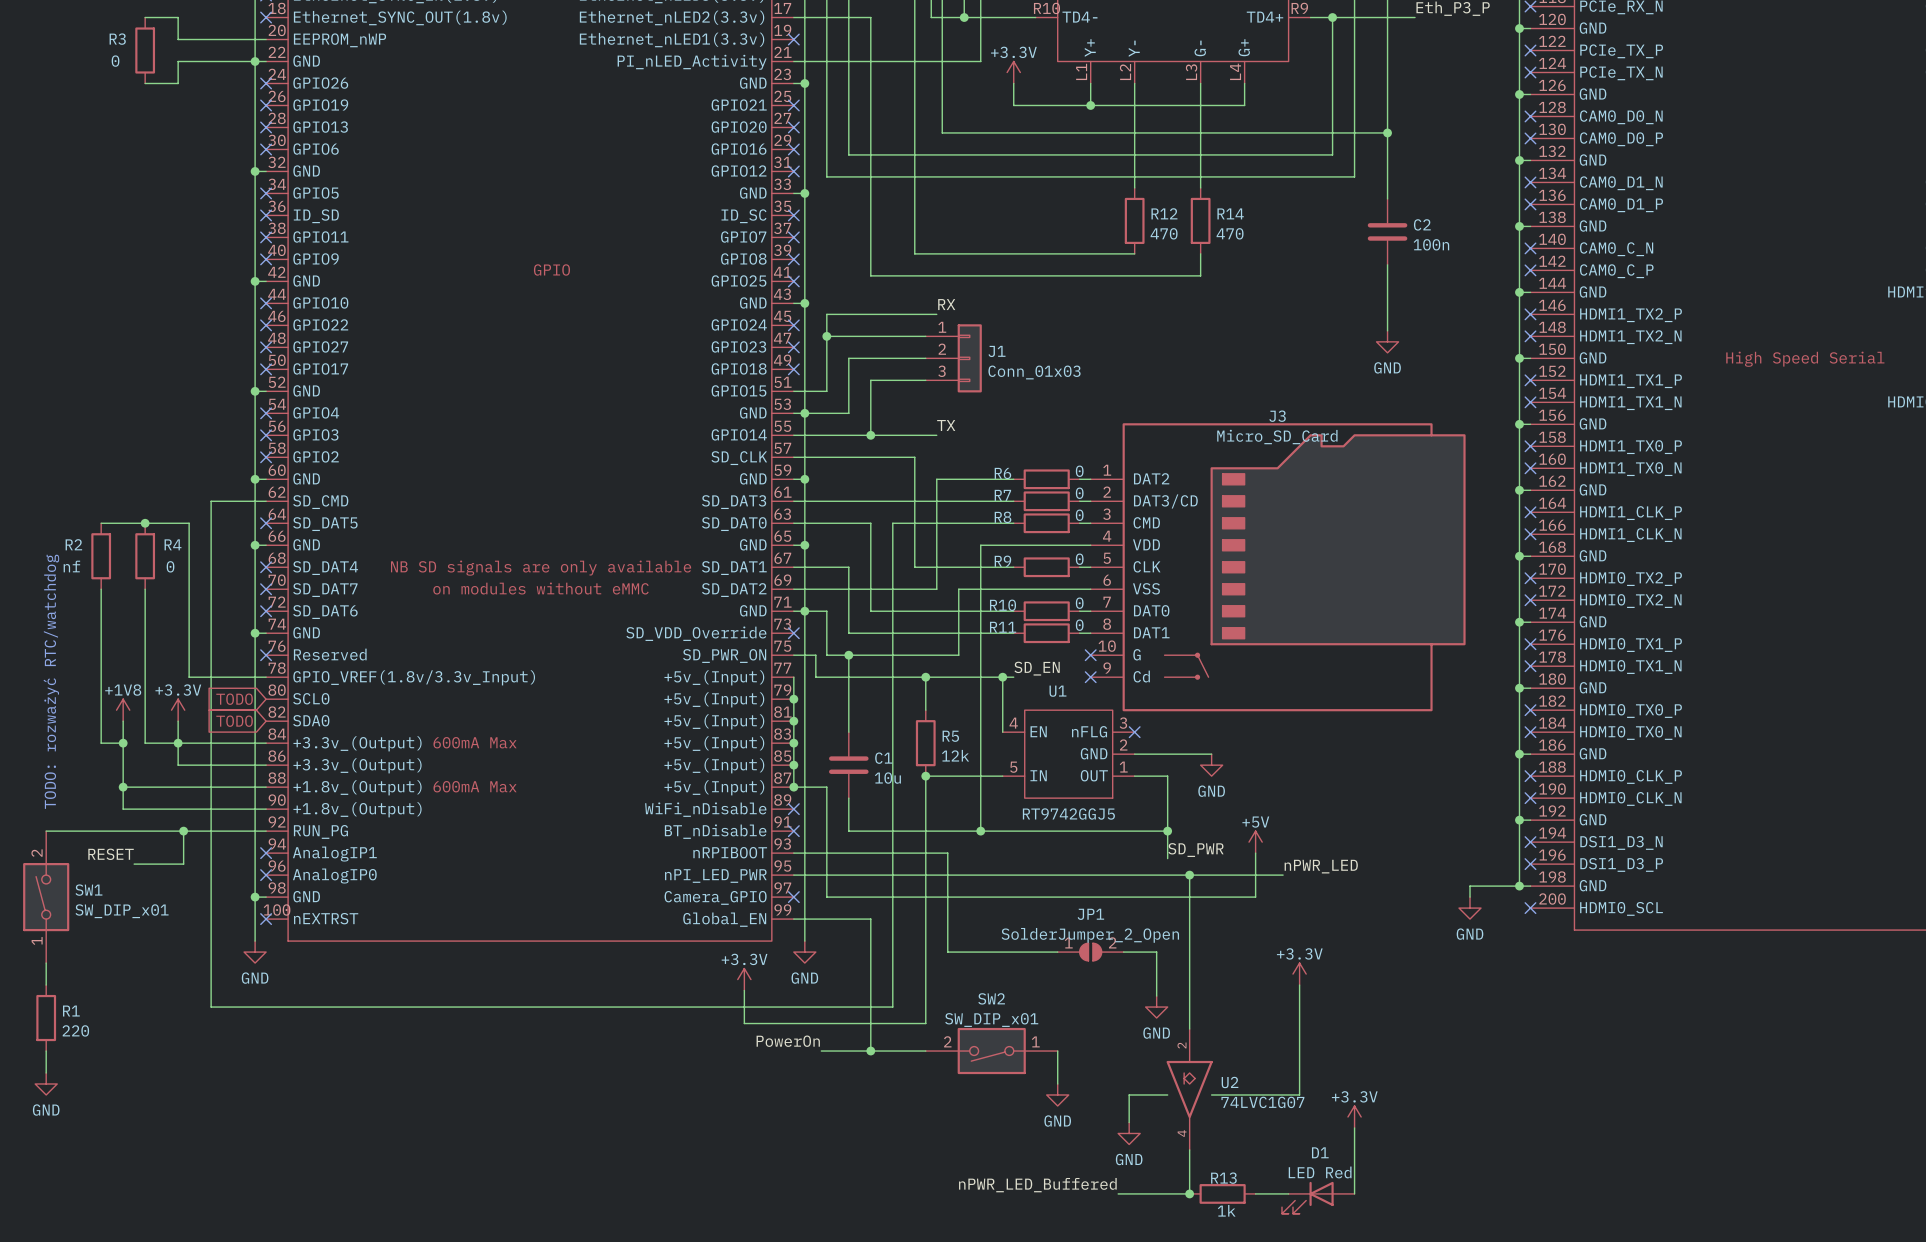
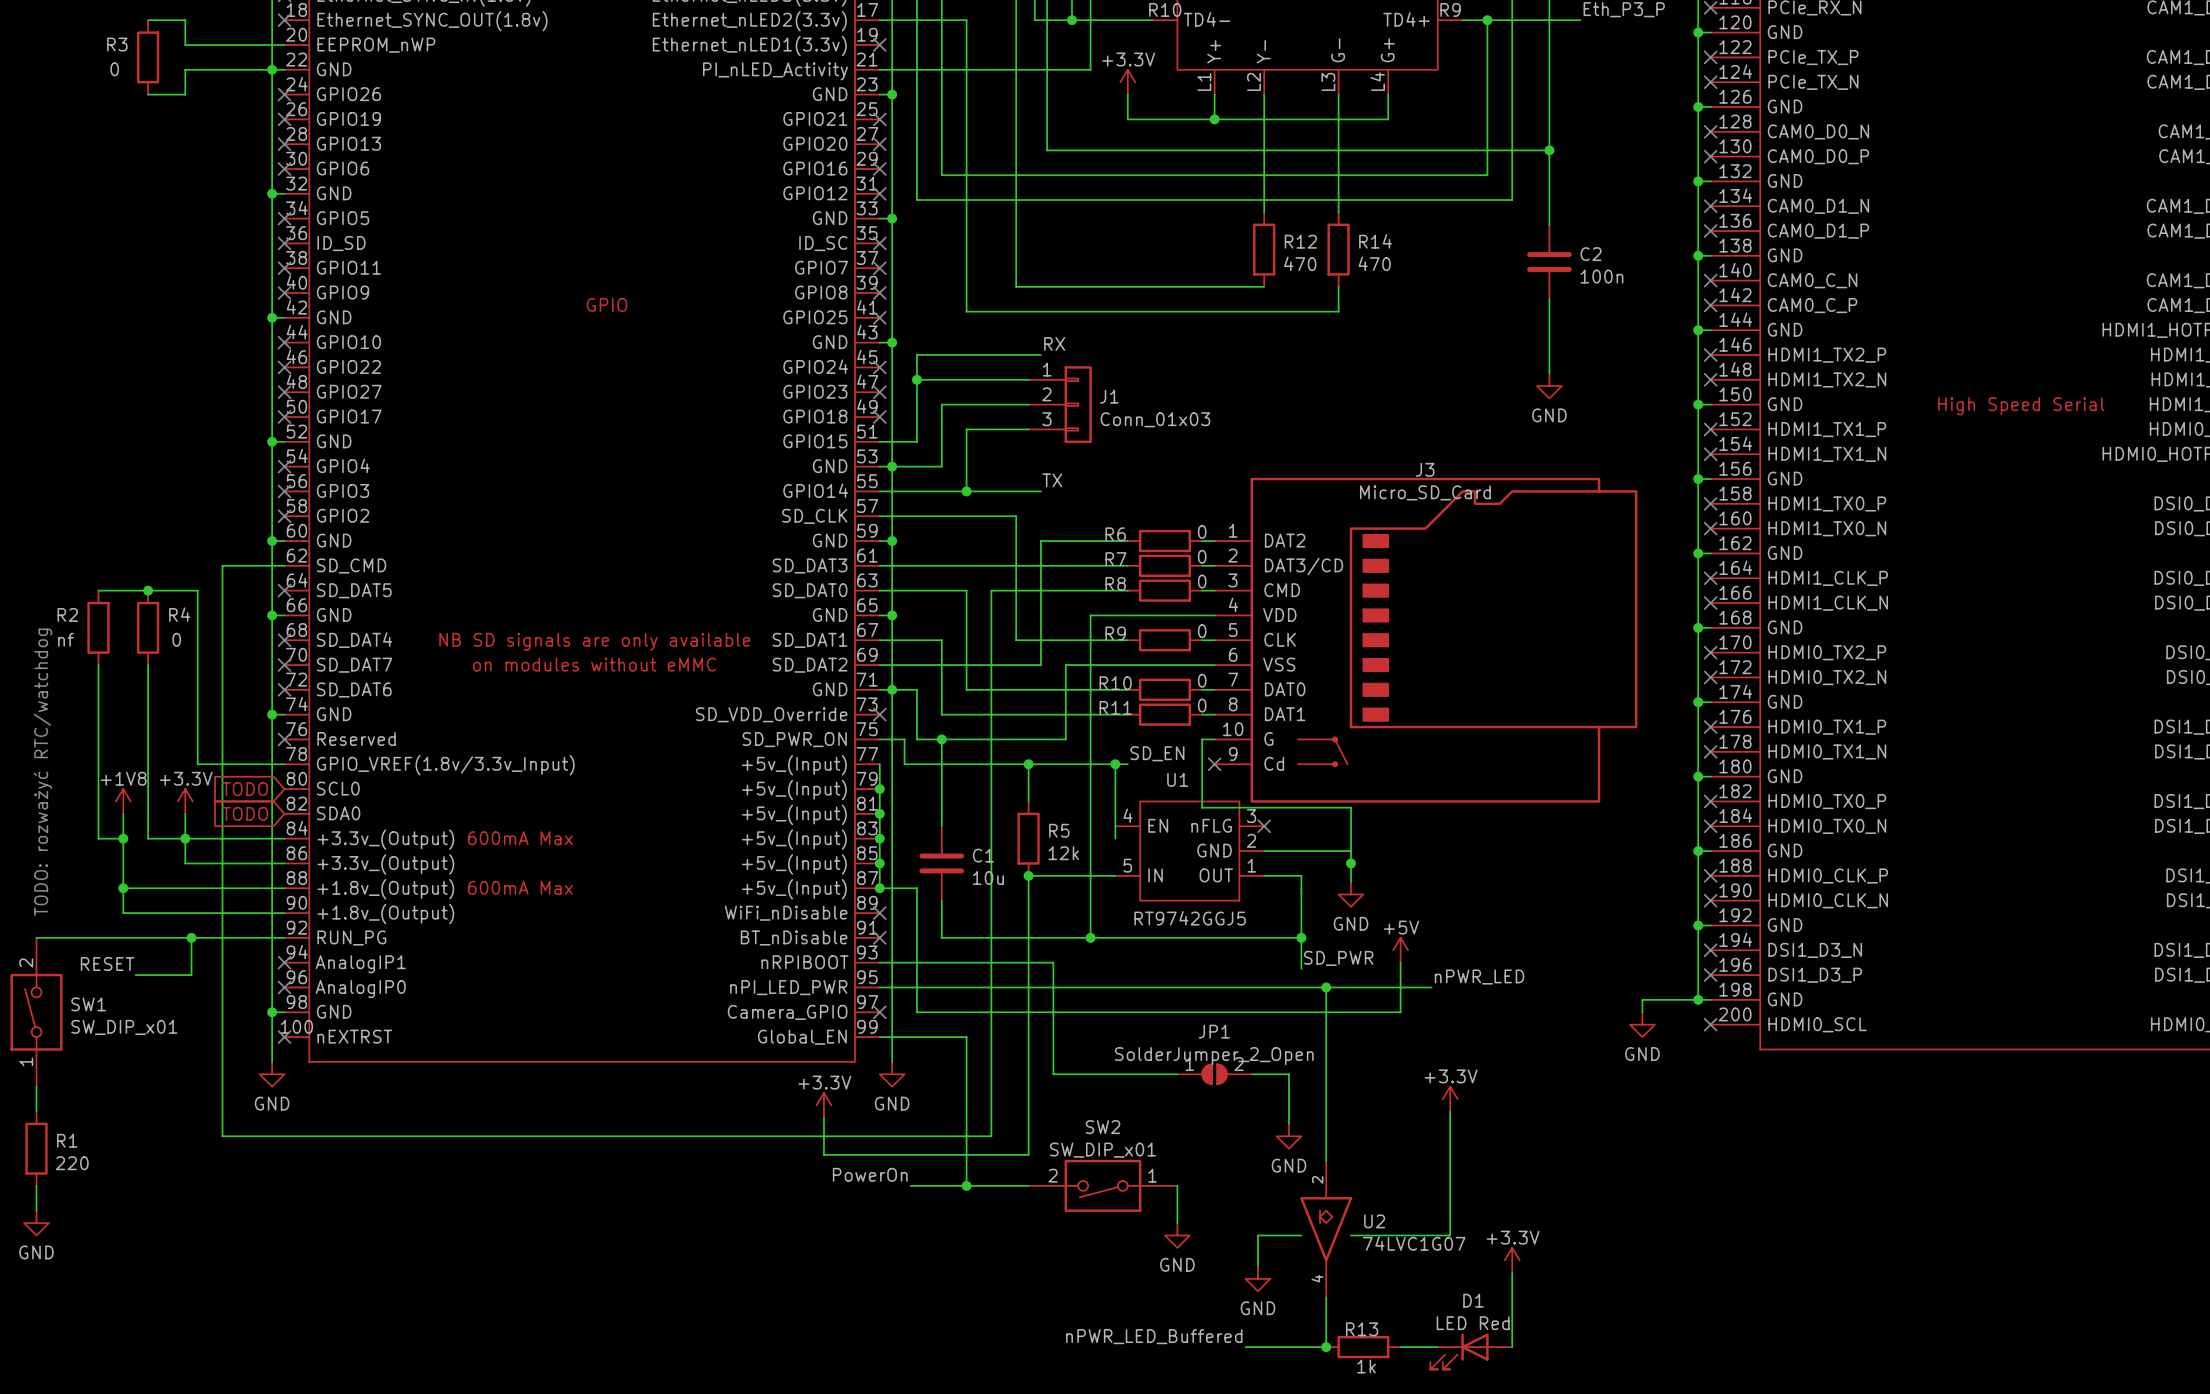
wire: none -> (1214, 739) (1202, 739) (1202, 807) (1351, 807) (1351, 882)
no-connect mark: (1090, 655) -> none
wire: none -> (1115, 826) (1115, 838)
power symbol position: GND (1211, 765) -> GND (1351, 894)
junction: none -> (1351, 863)

